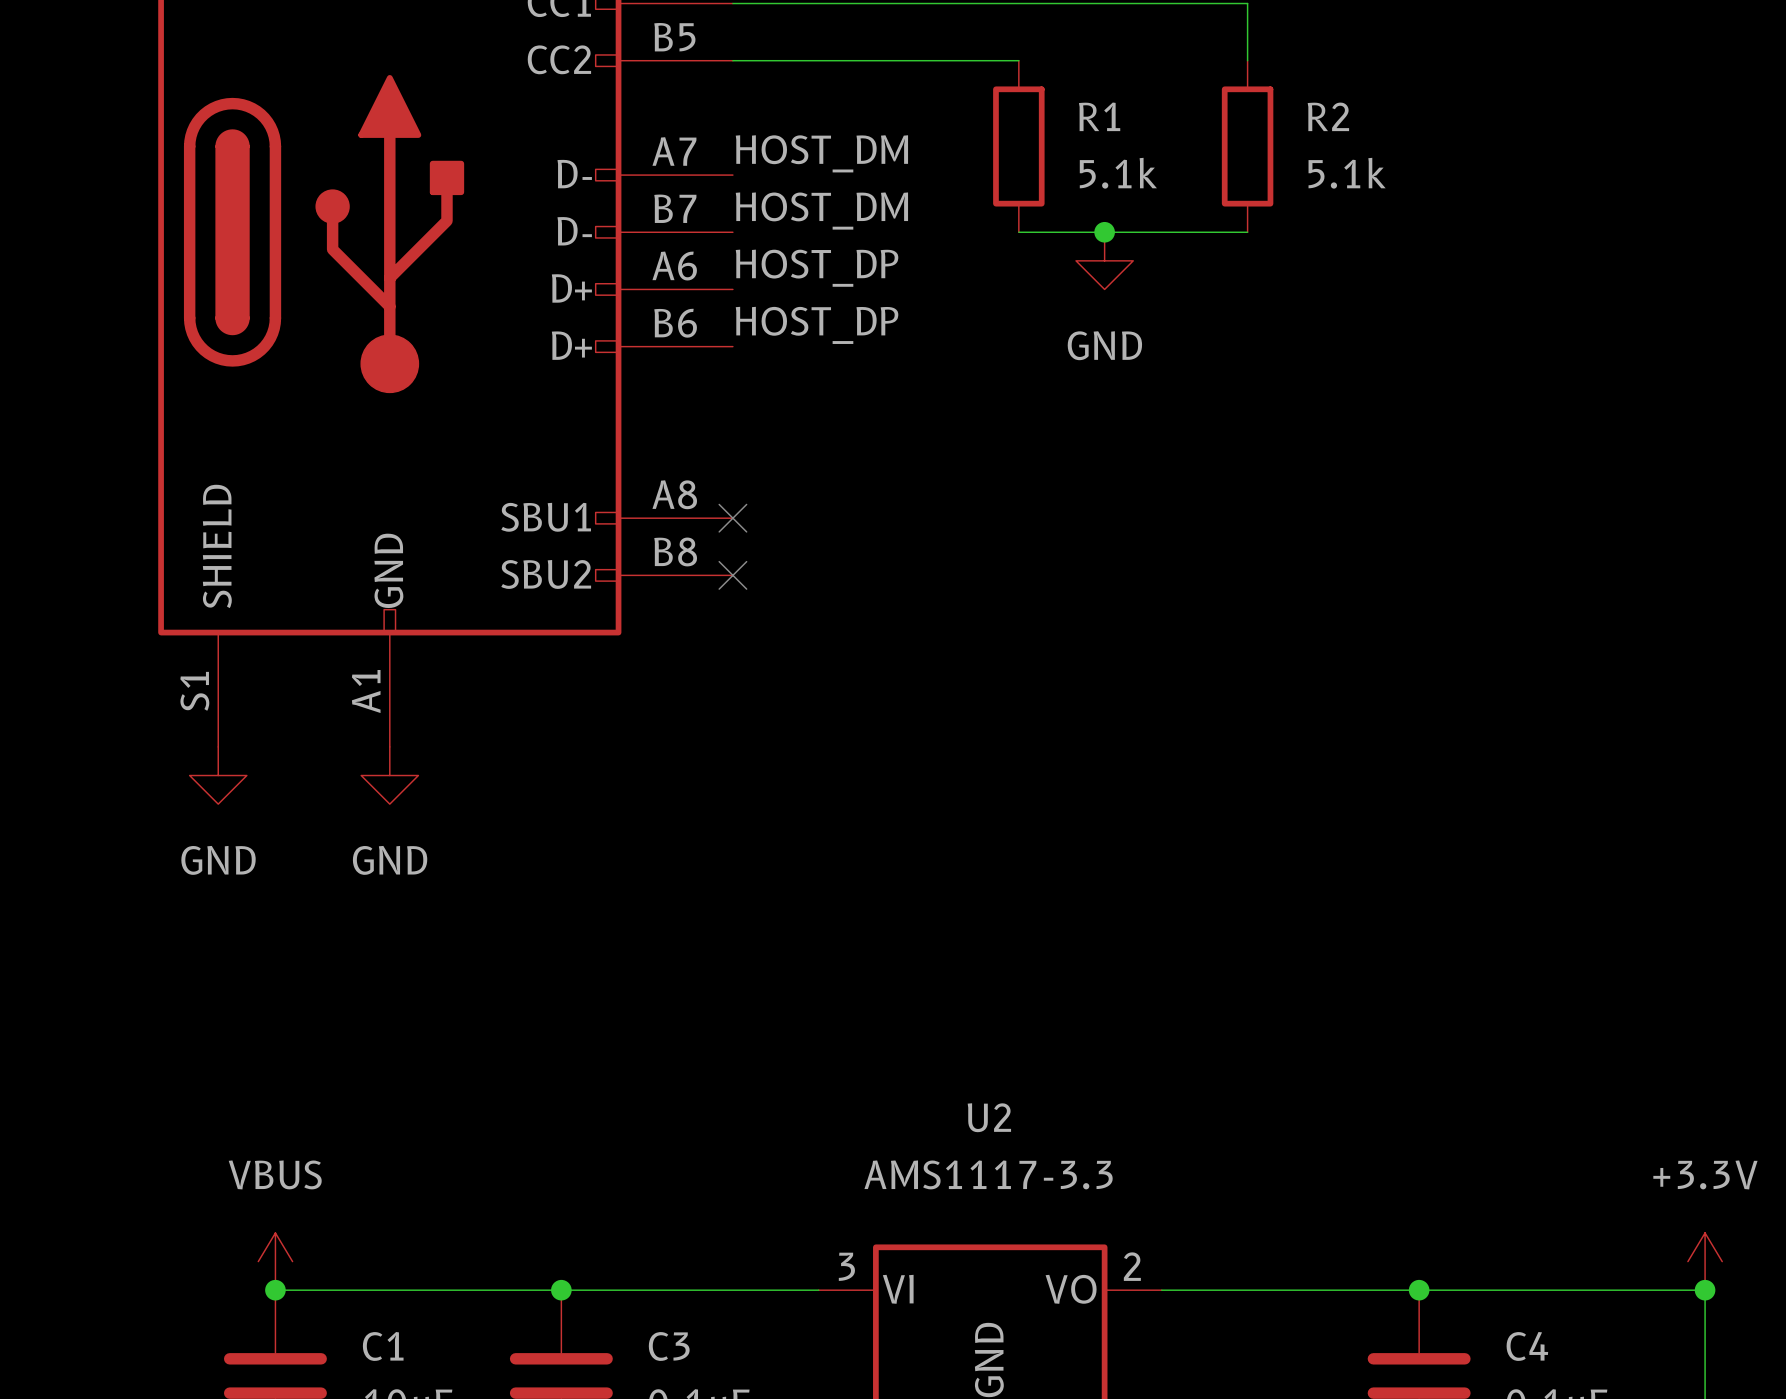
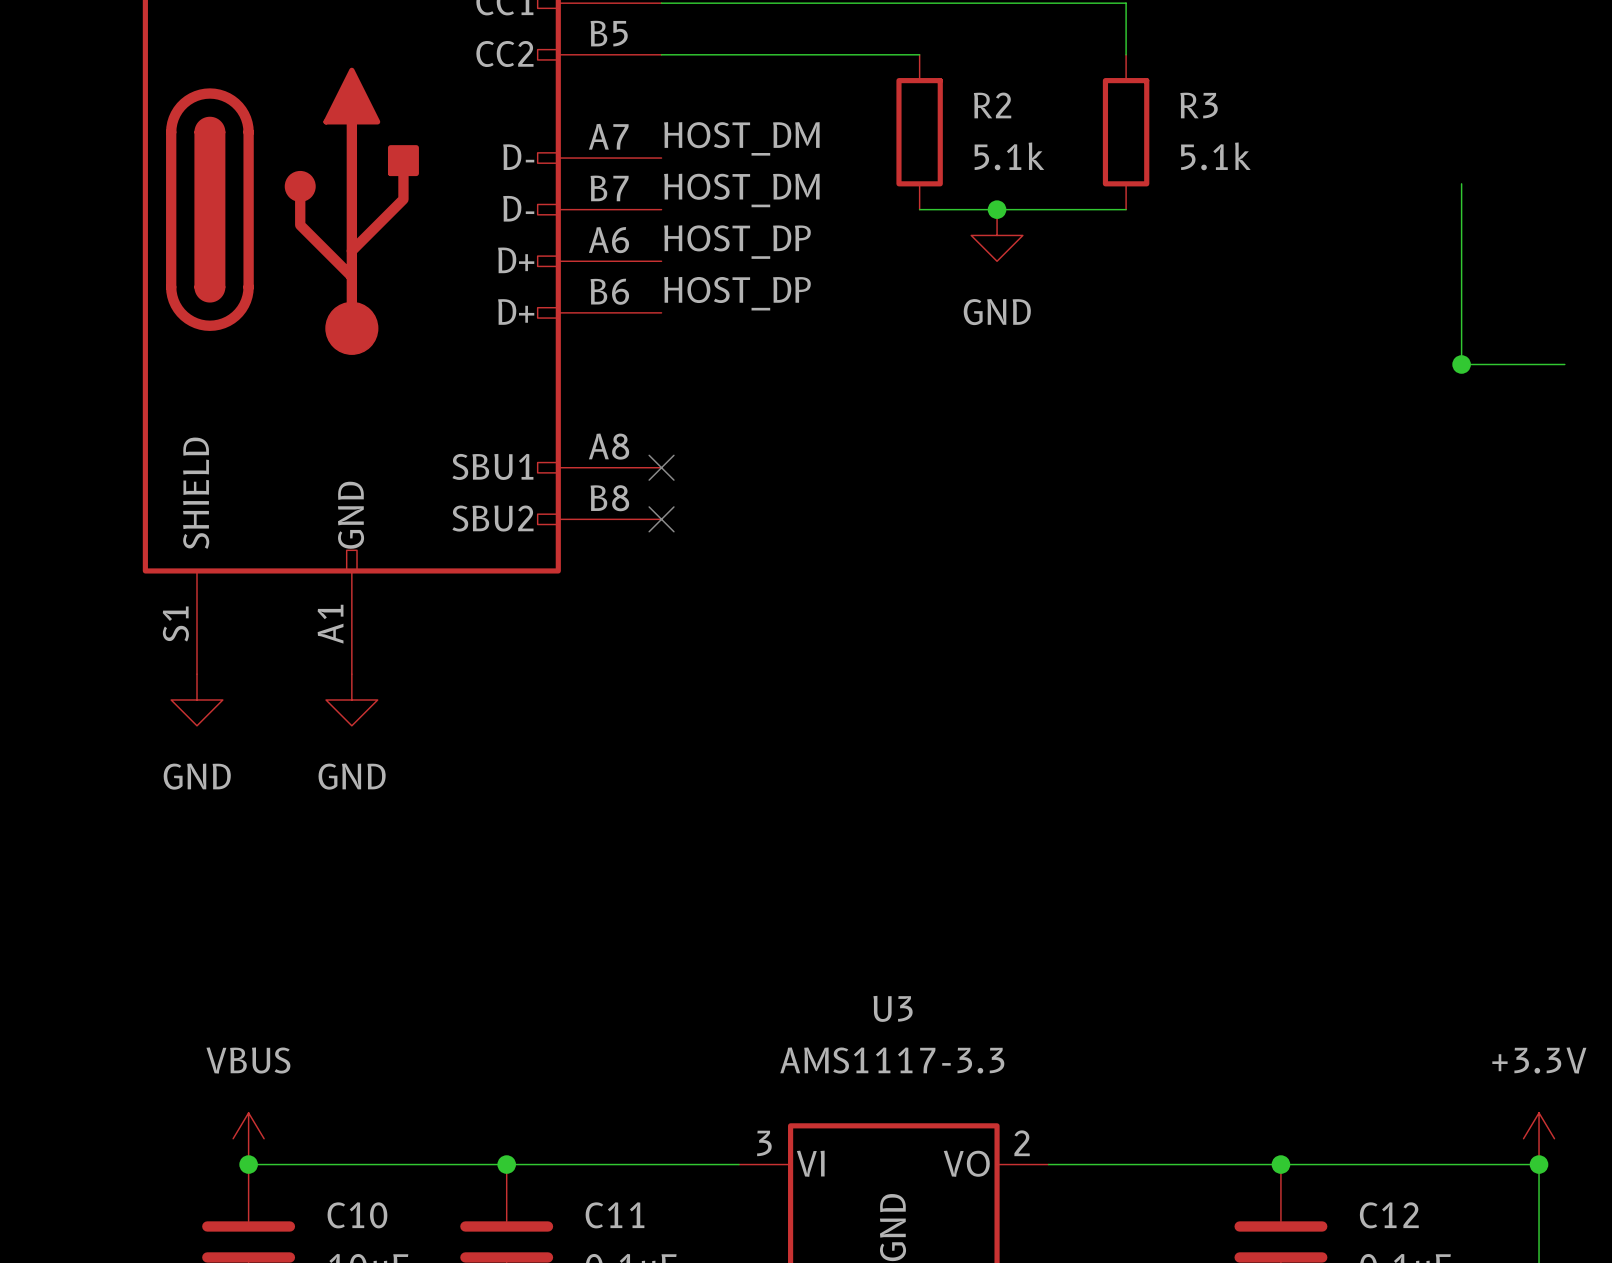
R1 name: R1 (1099, 116) -> R2 (992, 105)
R2 name: R2 (1328, 116) -> R3 (1199, 105)
wire: none -> (1461, 183) (1461, 364) (1564, 364)
junction: none -> (1461, 364)
U2 name: U2 (989, 1117) -> U3 (893, 1008)
C1 name: C1 (383, 1346) -> C10 (357, 1215)
C3 name: C3 (669, 1346) -> C11 (615, 1215)
C4 name: C4 (1527, 1346) -> C12 (1389, 1215)

